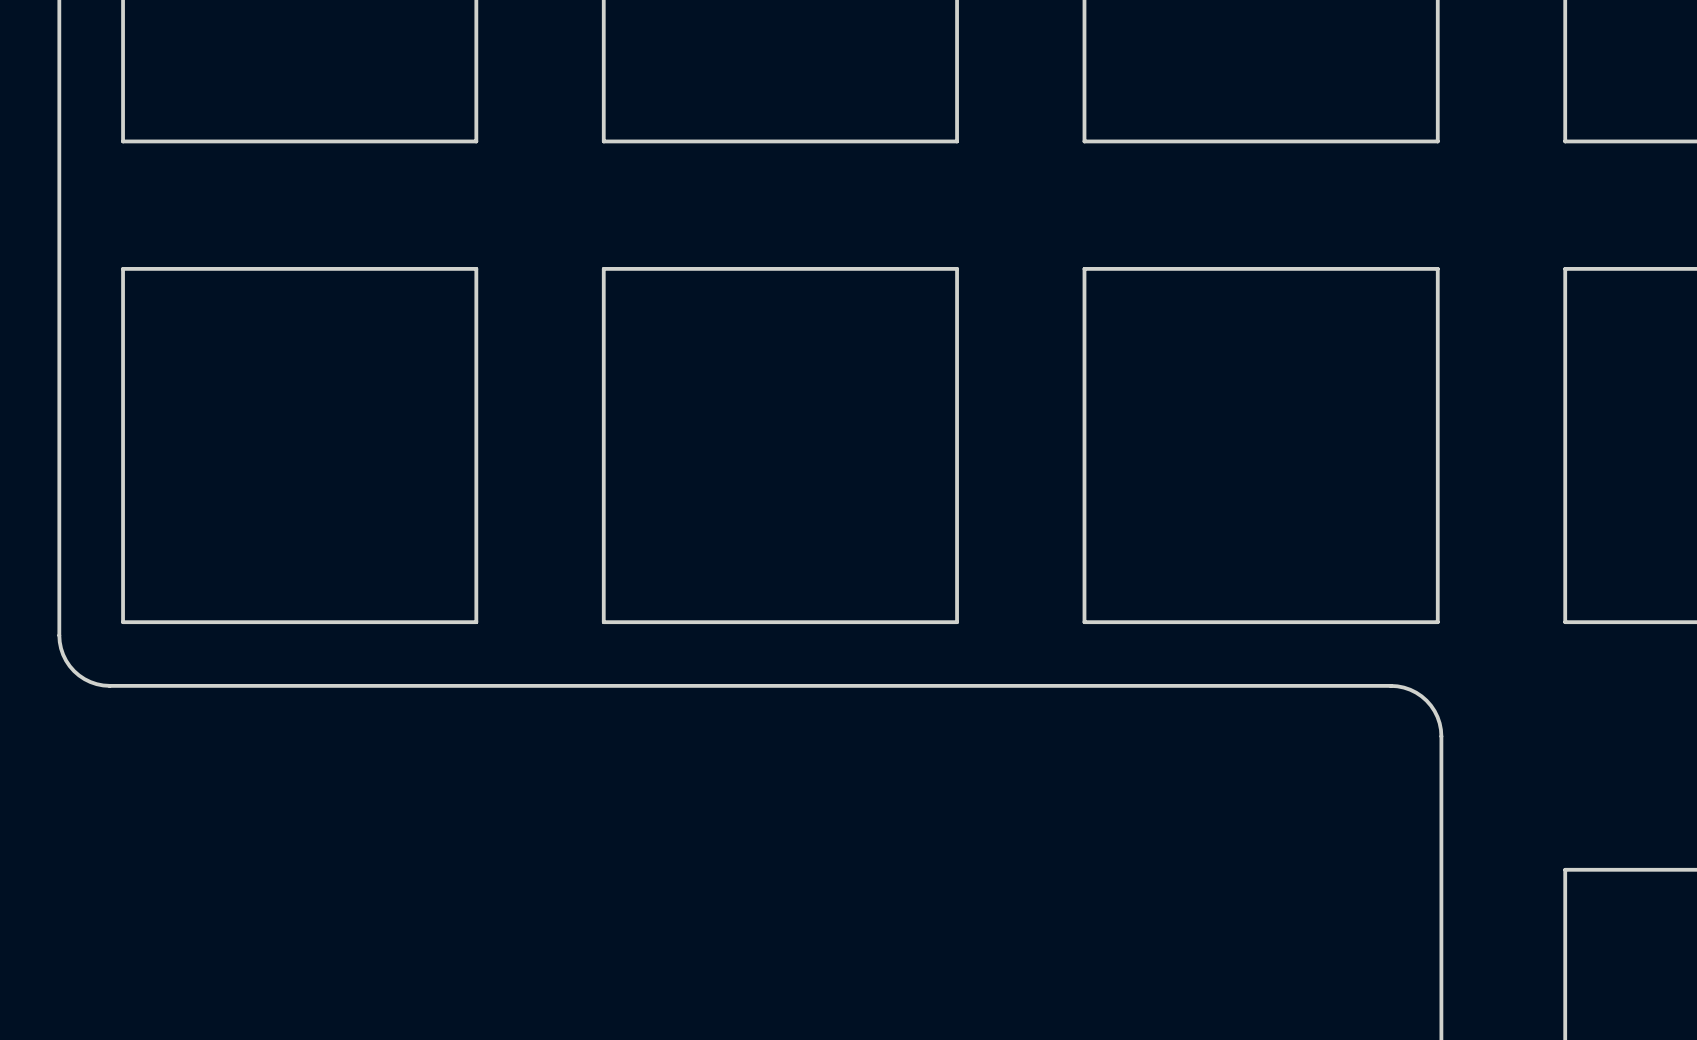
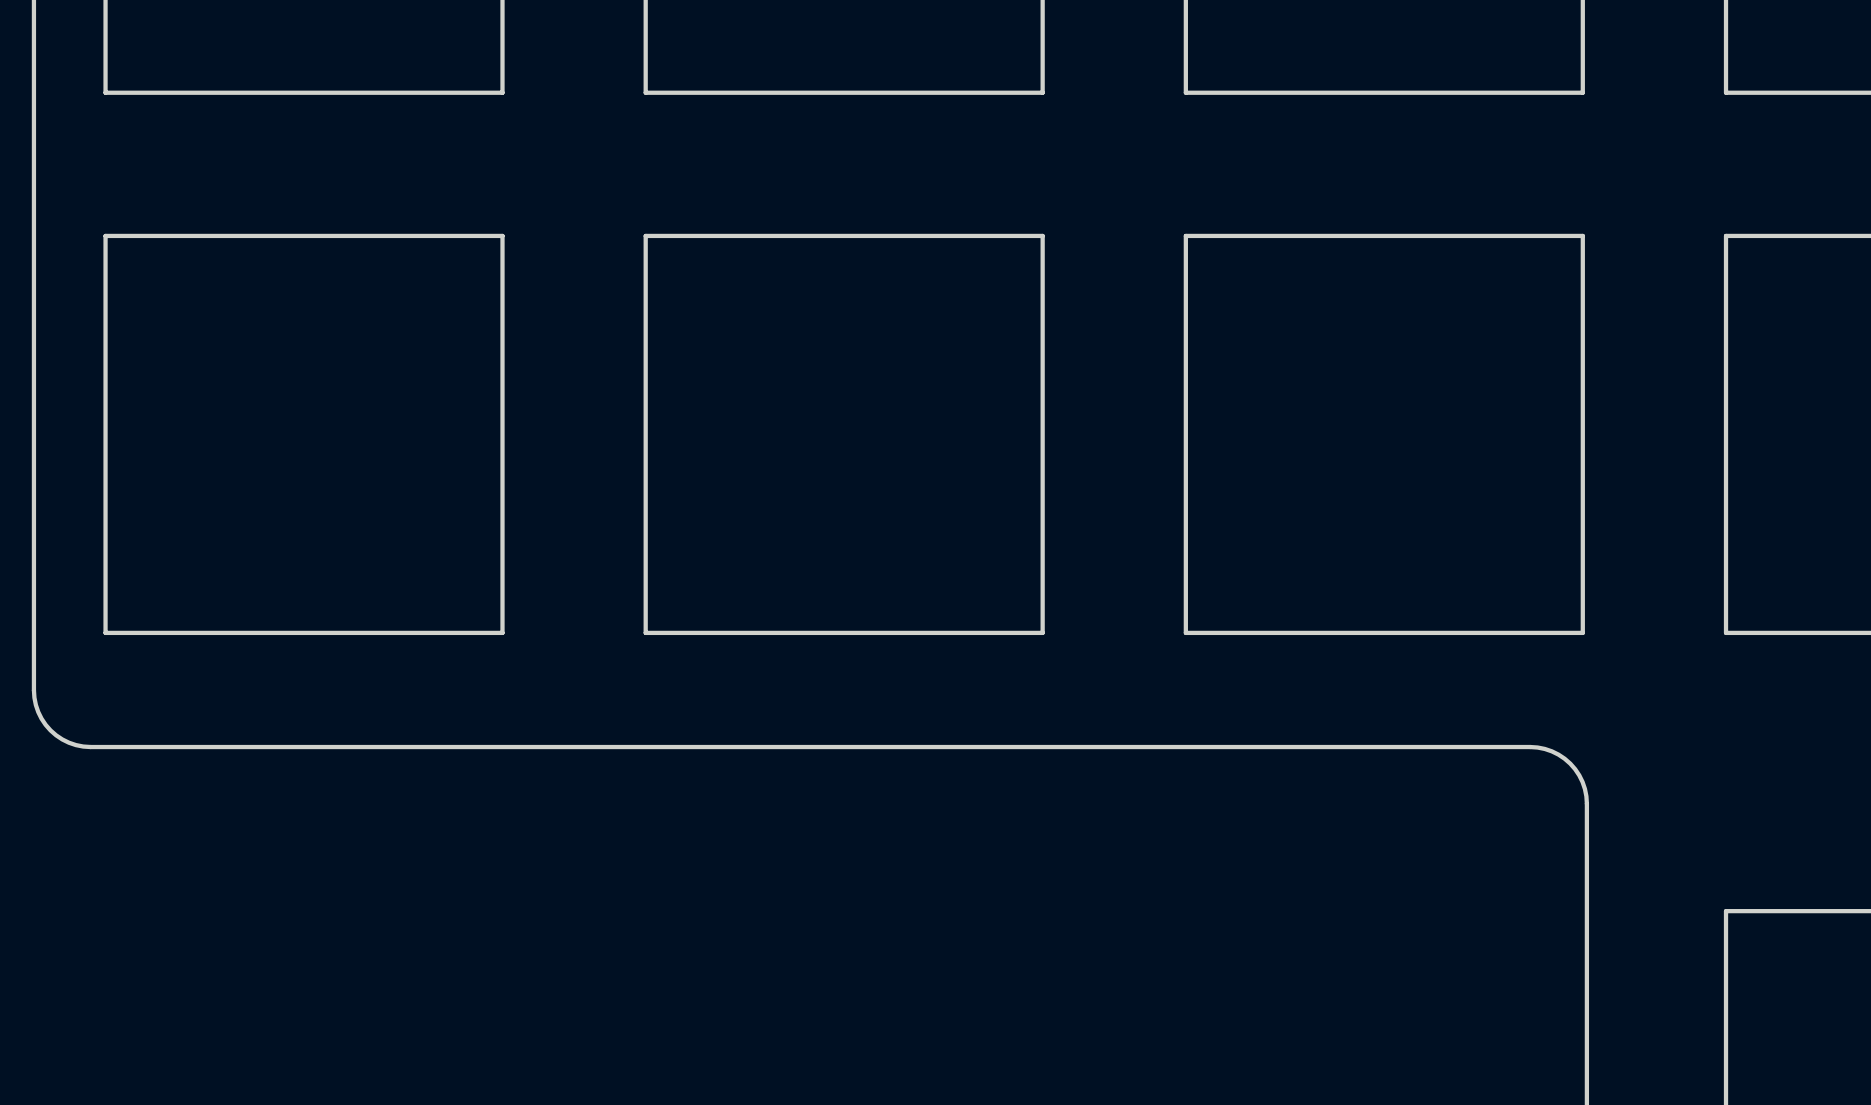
board edge: (59, 635) (63, 654) (74, 671) (90, 682) (109, 685) (1397, 686) (1410, 689) (1421, 696) (1434, 711) (1440, 729) (1441, 774) -> (33, 647) (34, 697) (41, 718) (56, 735) (68, 742) (83, 746) (1530, 747) (1551, 751) (1570, 763) (1582, 782) (1586, 803)

